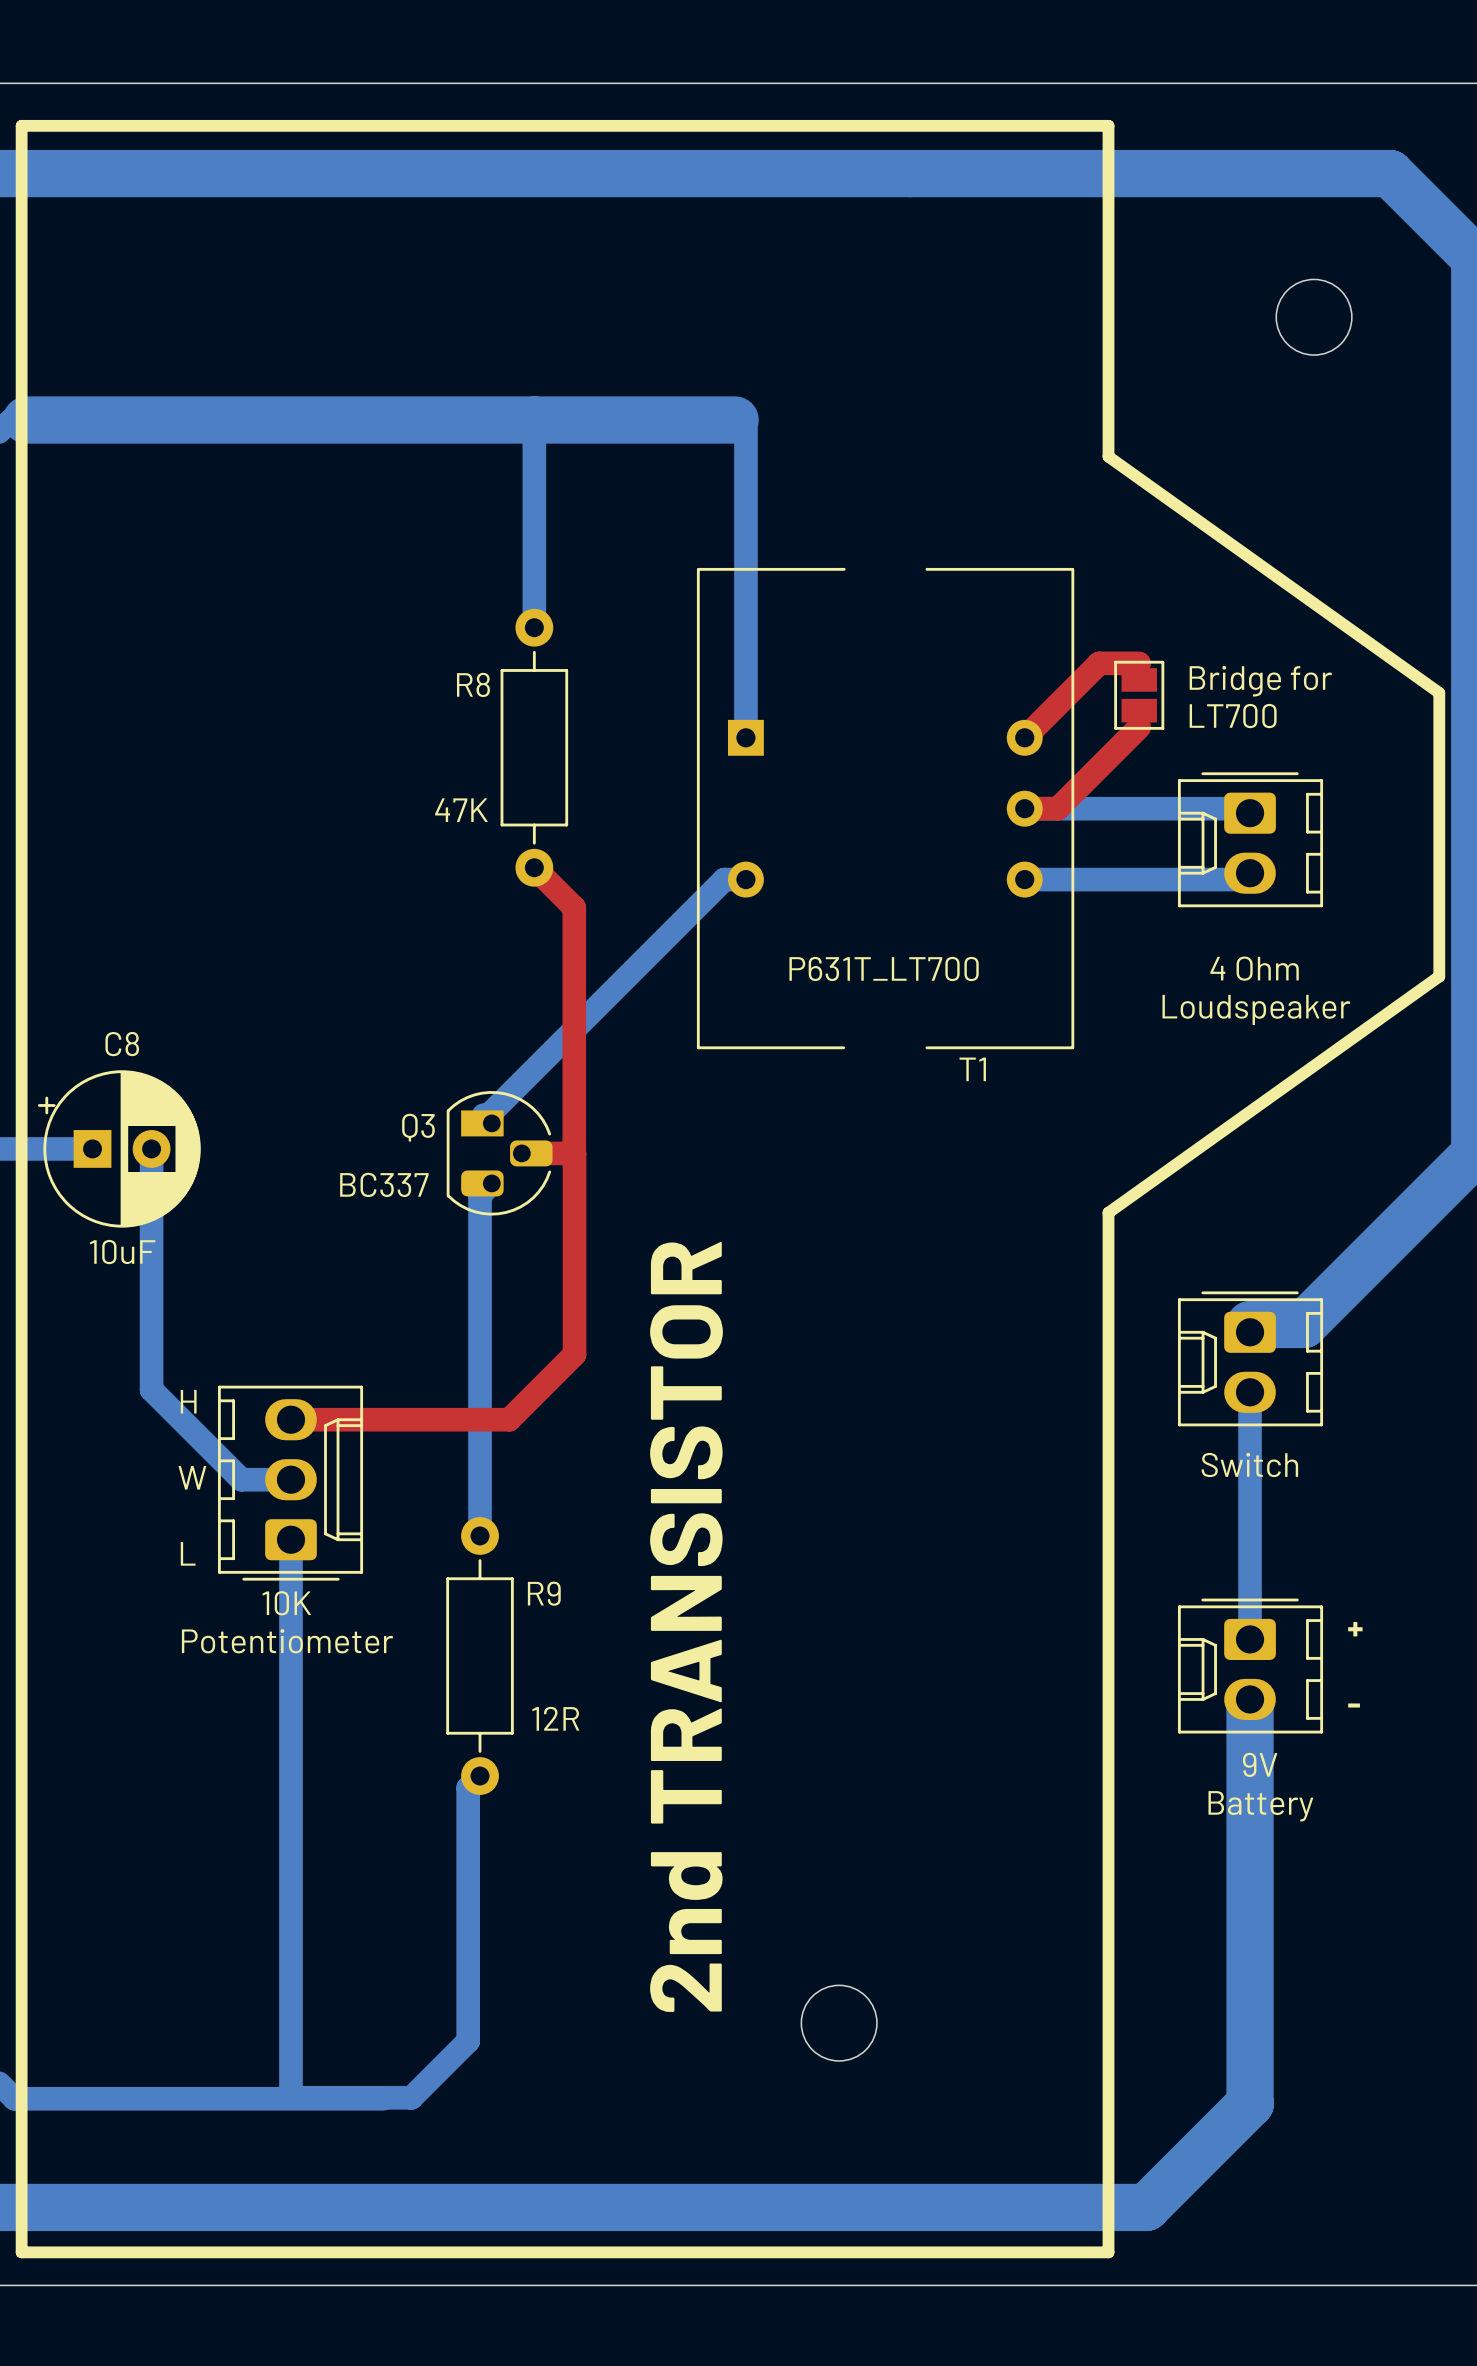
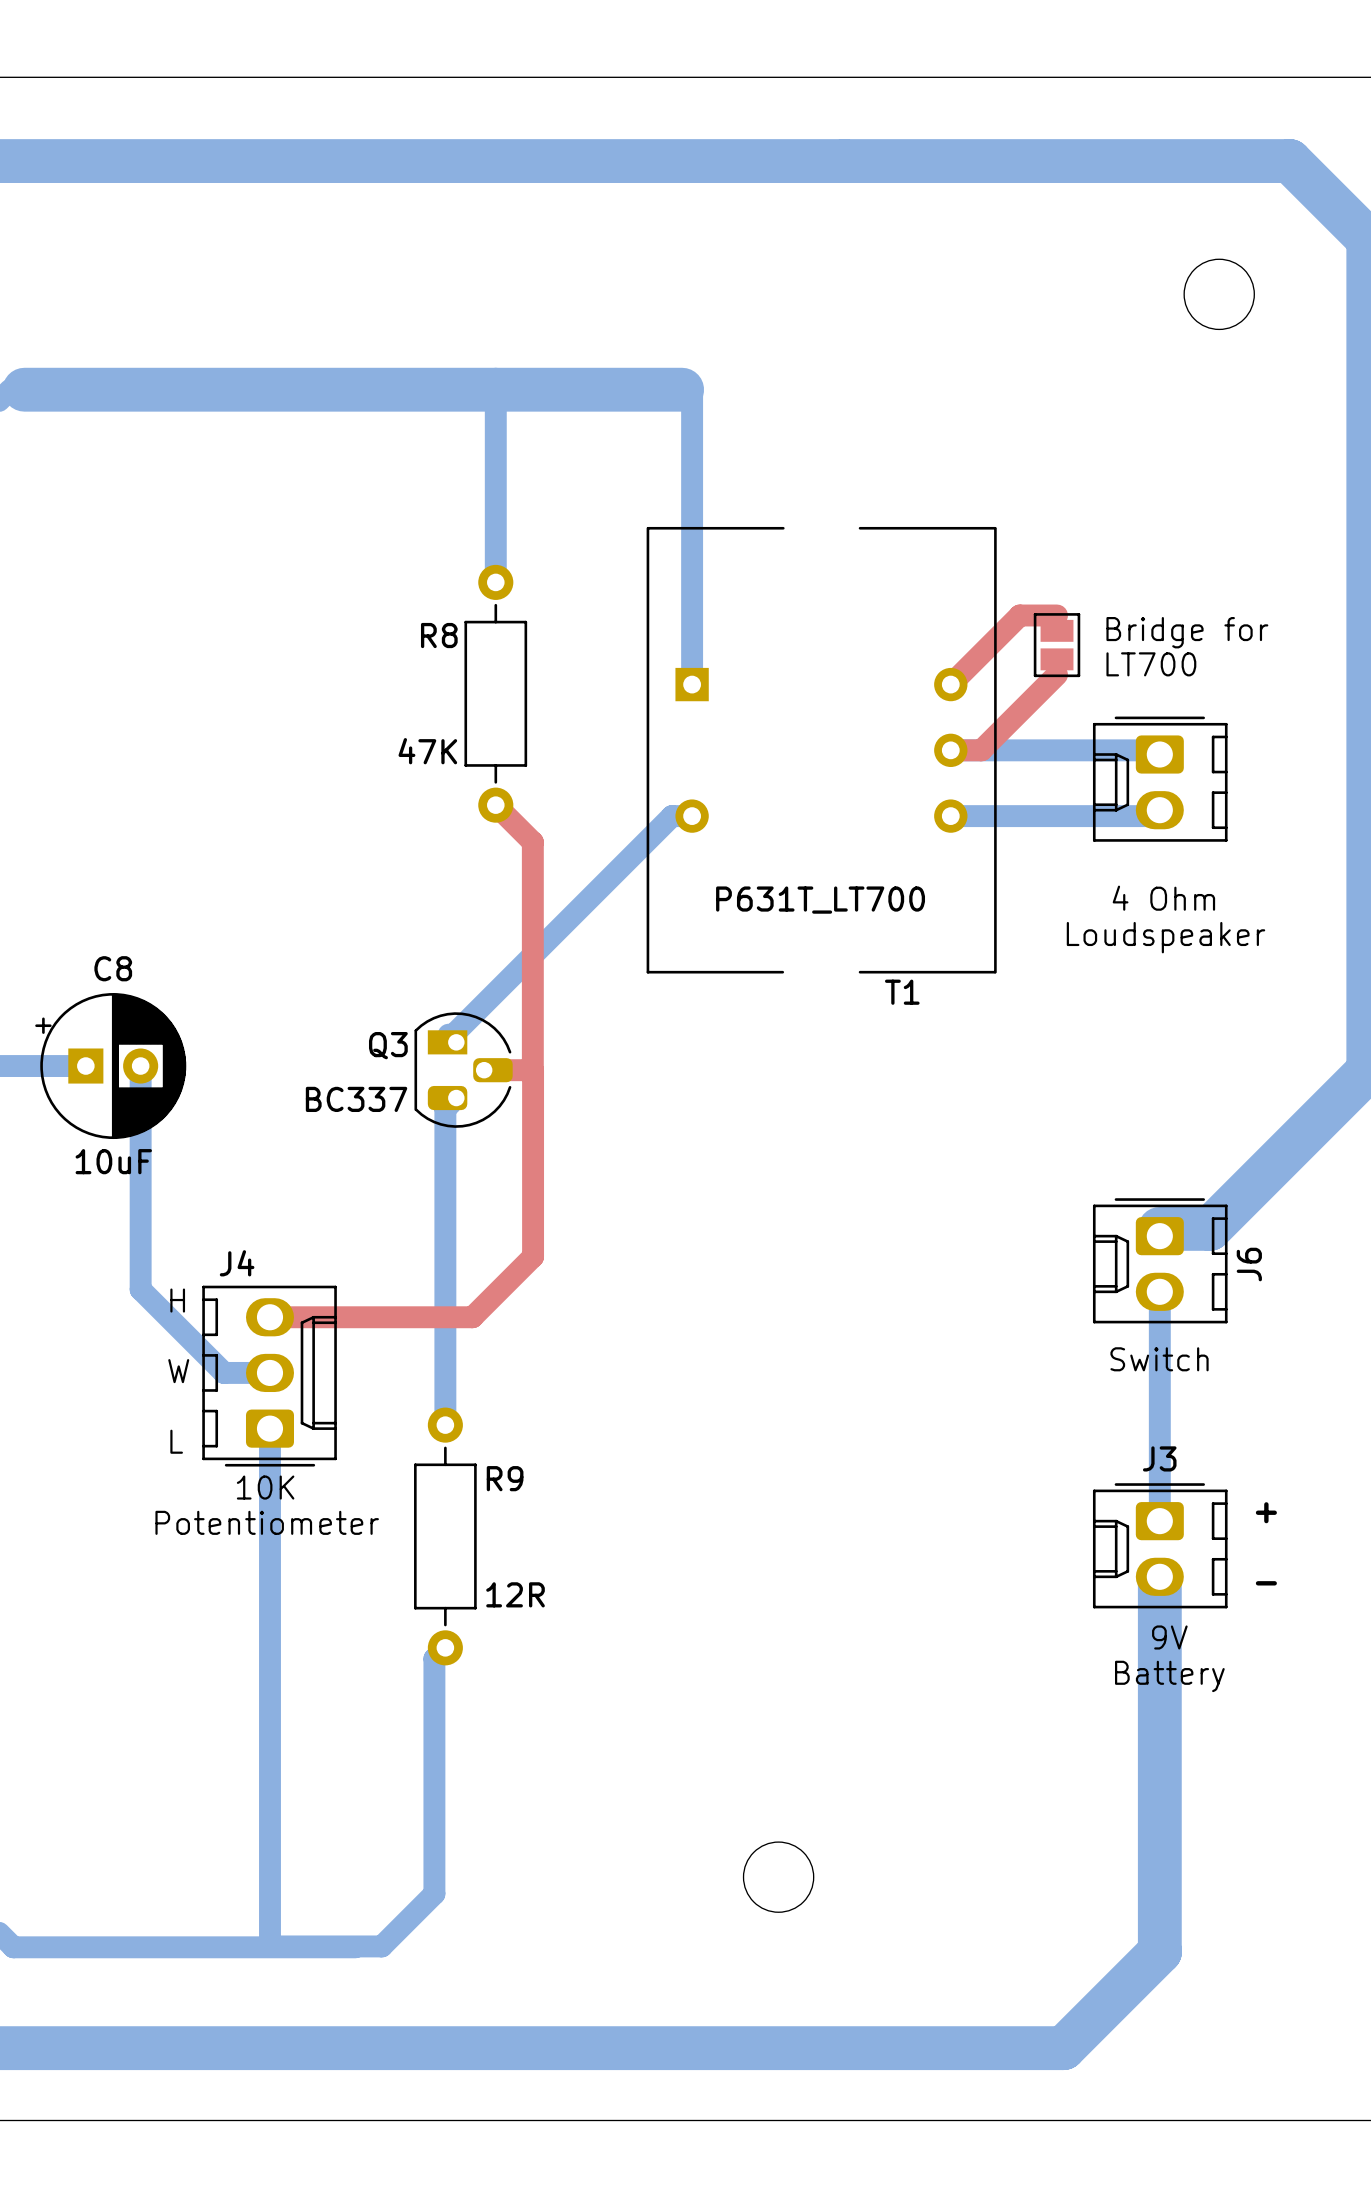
line: (21, 125) (21, 2252) (1108, 2252) (1108, 1212) (1439, 976) (1439, 692) (1108, 456) (1108, 125) (21, 125) -> none
J4 name: none -> J4 (237, 1263)
J6 name: none -> J6 (1249, 1264)
J3 name: none -> J3 (1159, 1458)
text: 2nd TRANSISTOR (686, 1626) -> none

